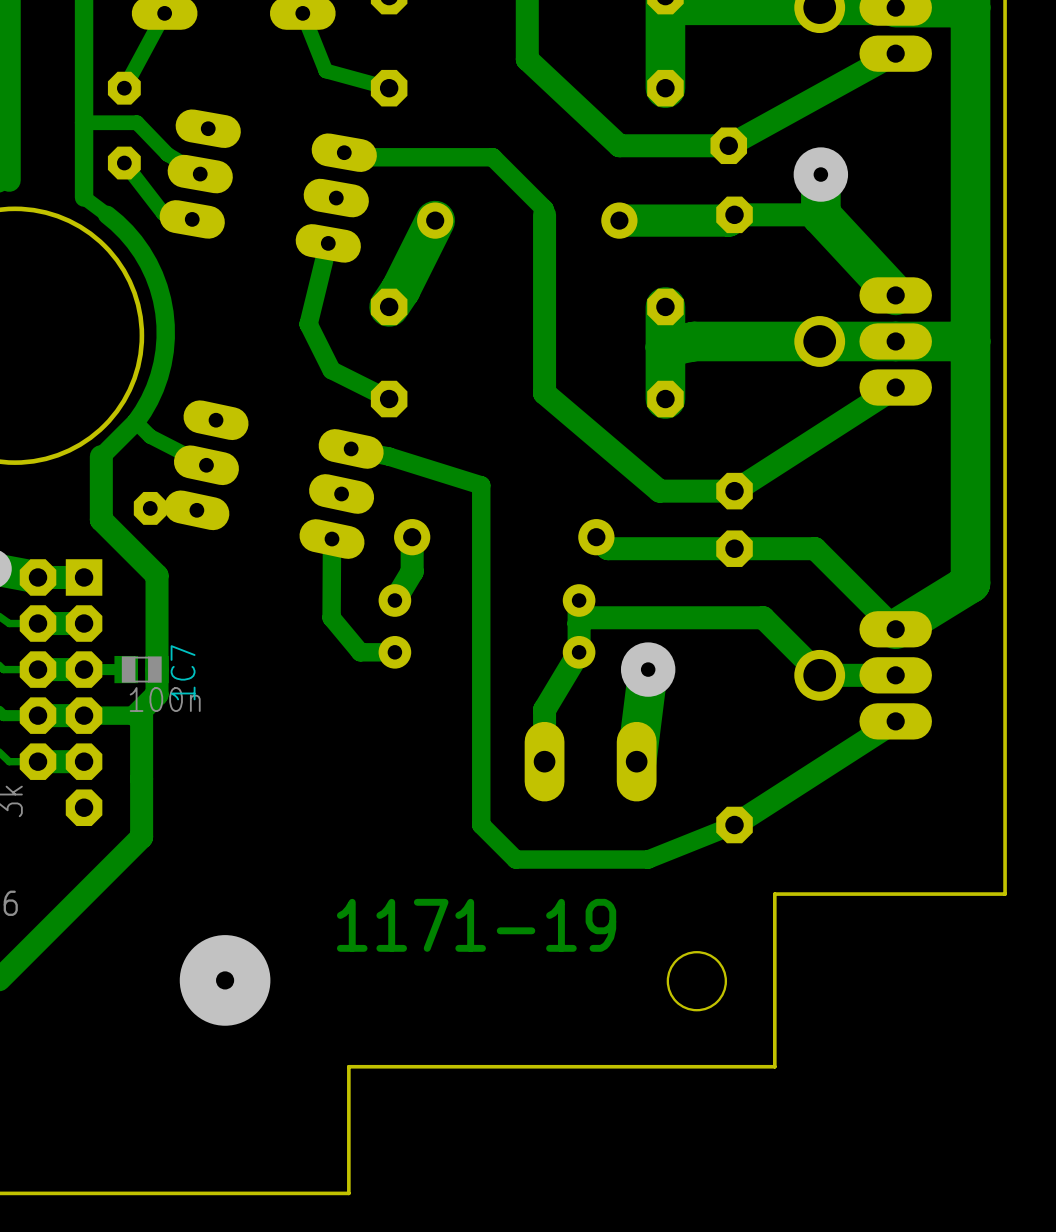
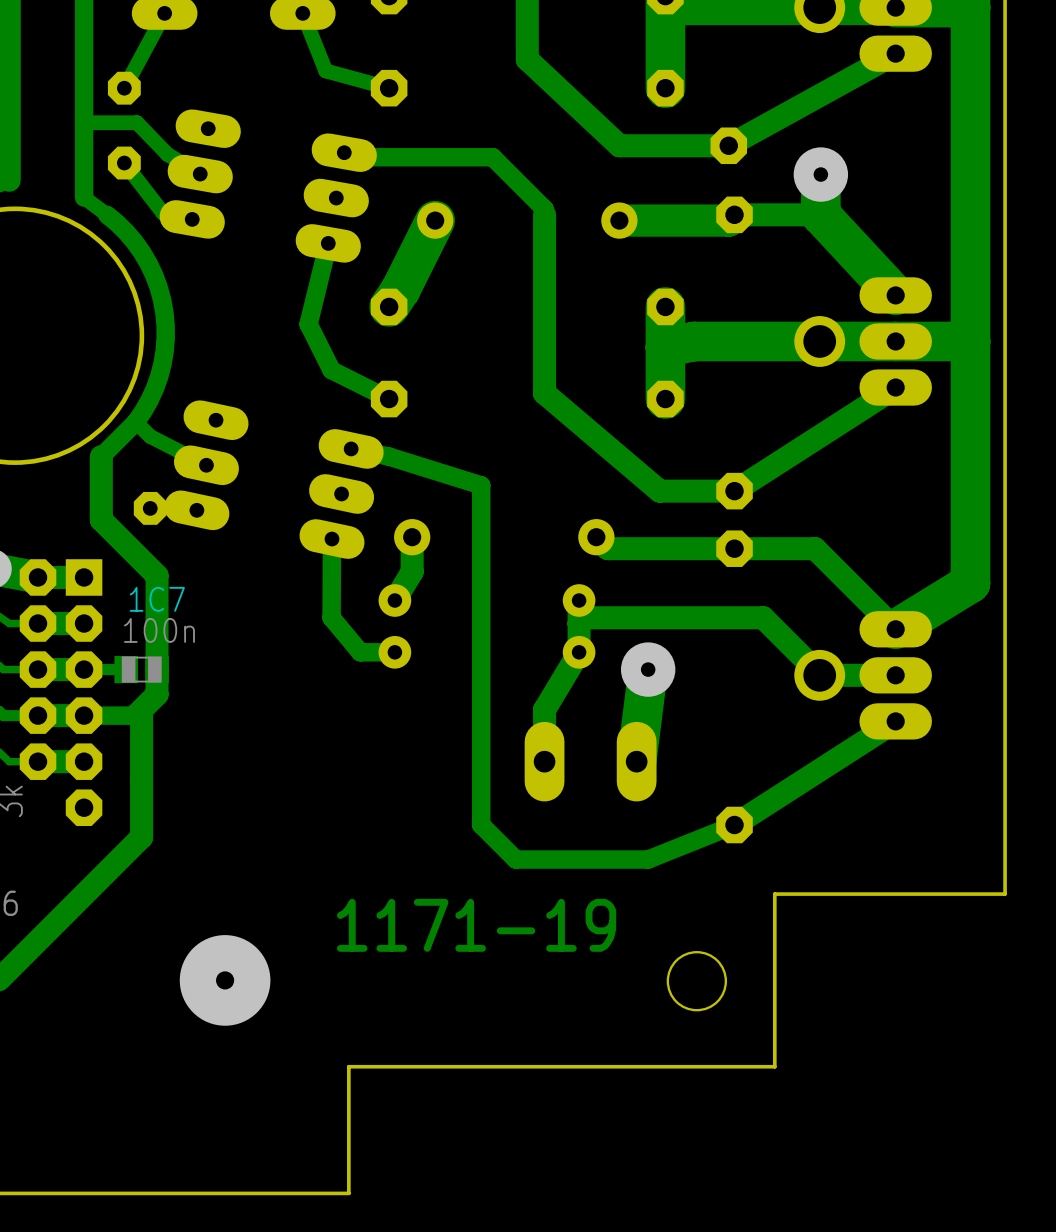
1C7 name rotation: 0° (183, 672) -> 90° clockwise (157, 599)
1C7 name position: 1C7 (183, 672) -> 1C7 (157, 599)
1C7 value position: 100n (165, 699) -> 100n (159, 630)

